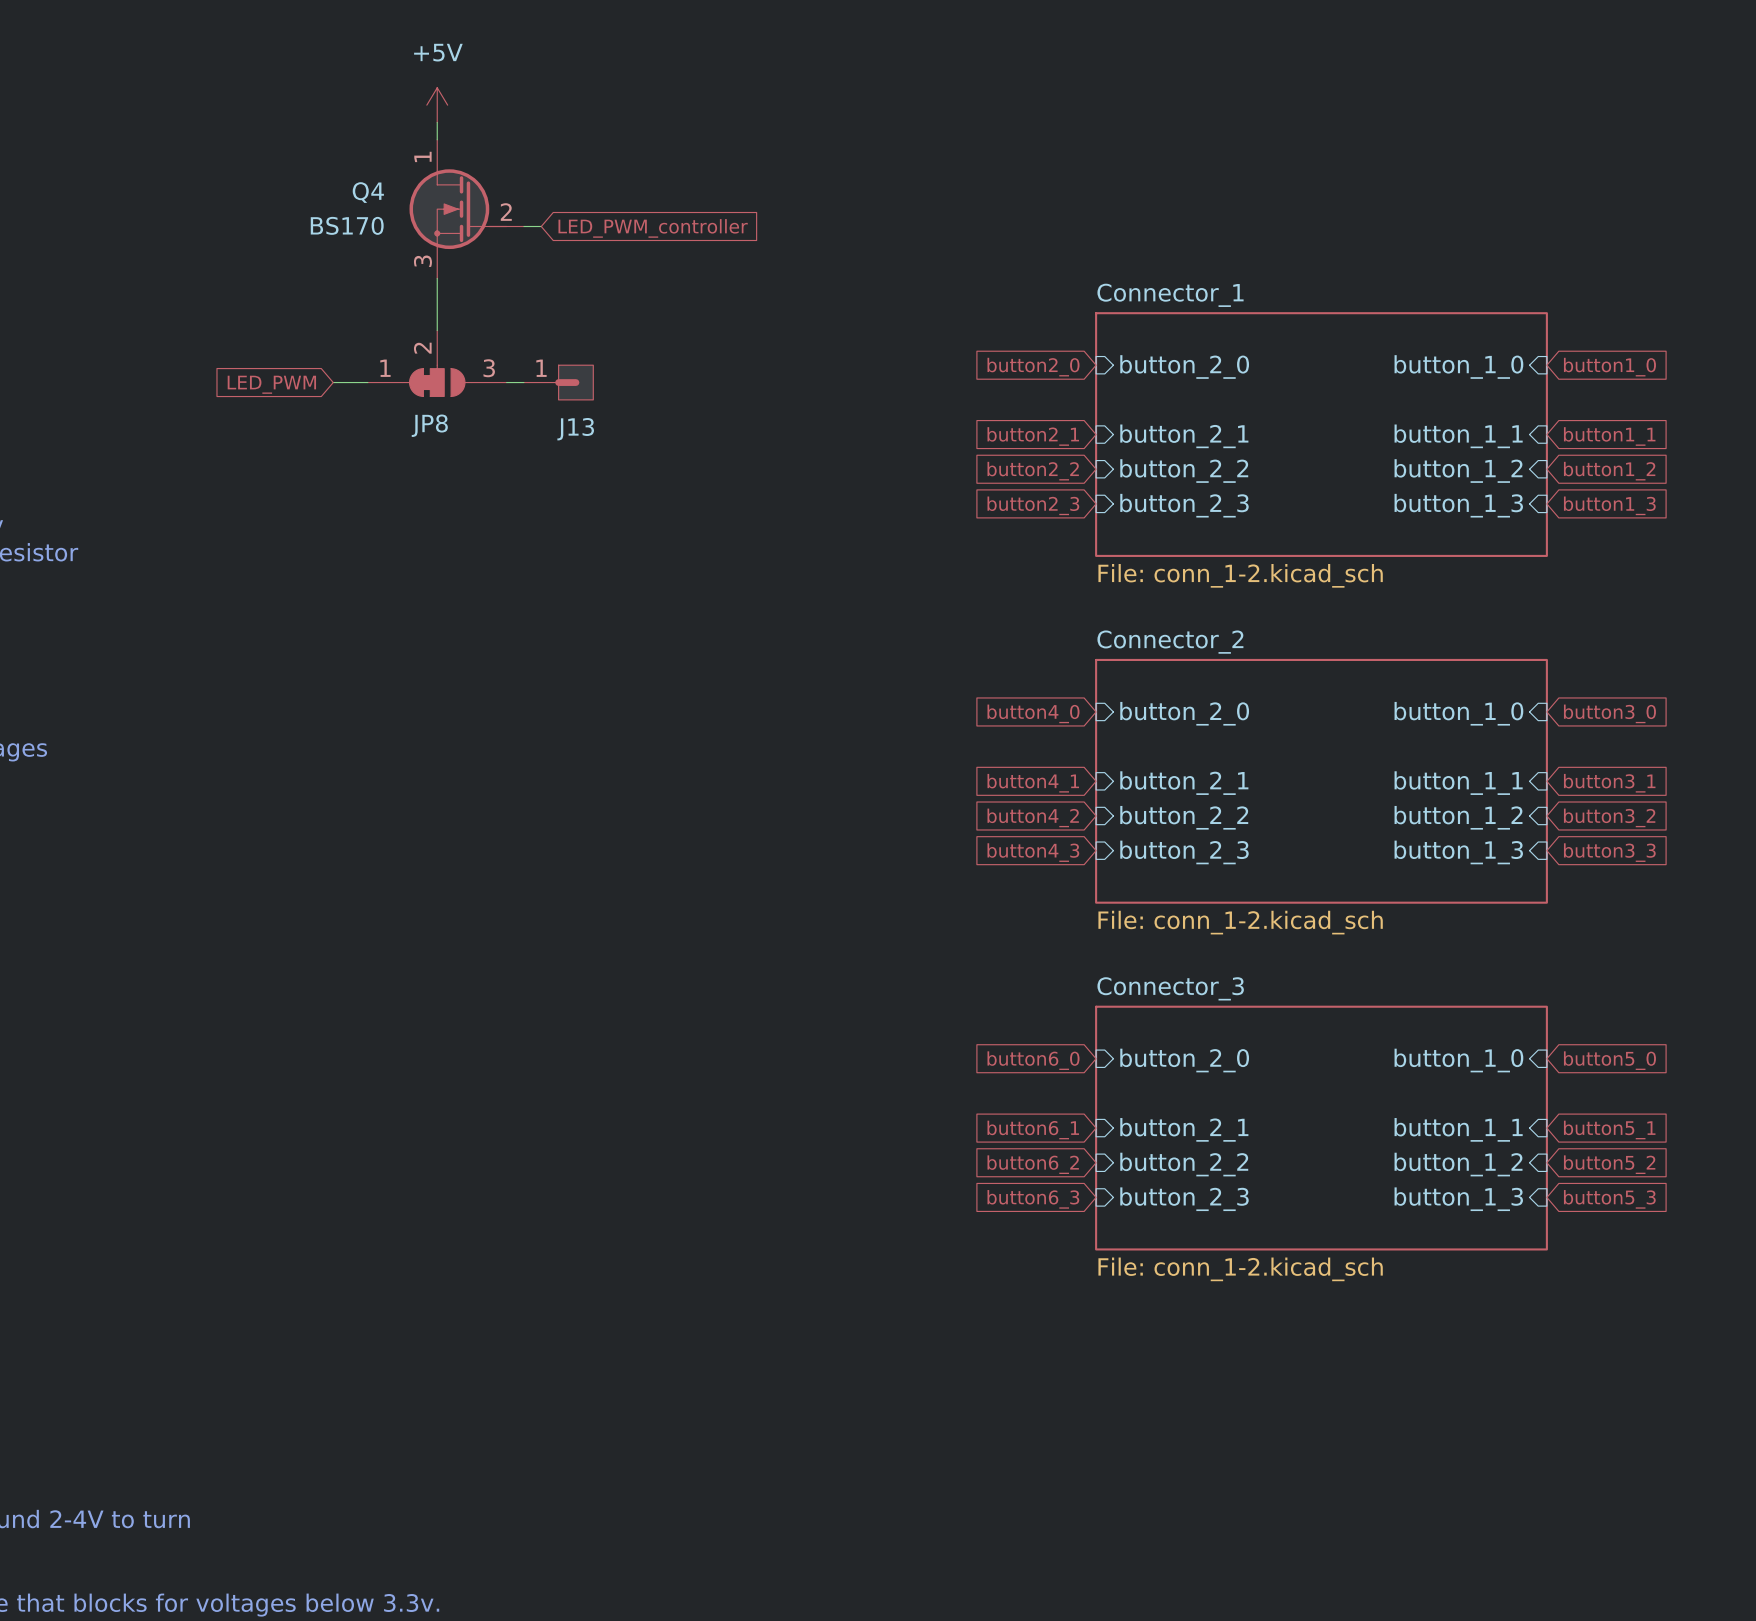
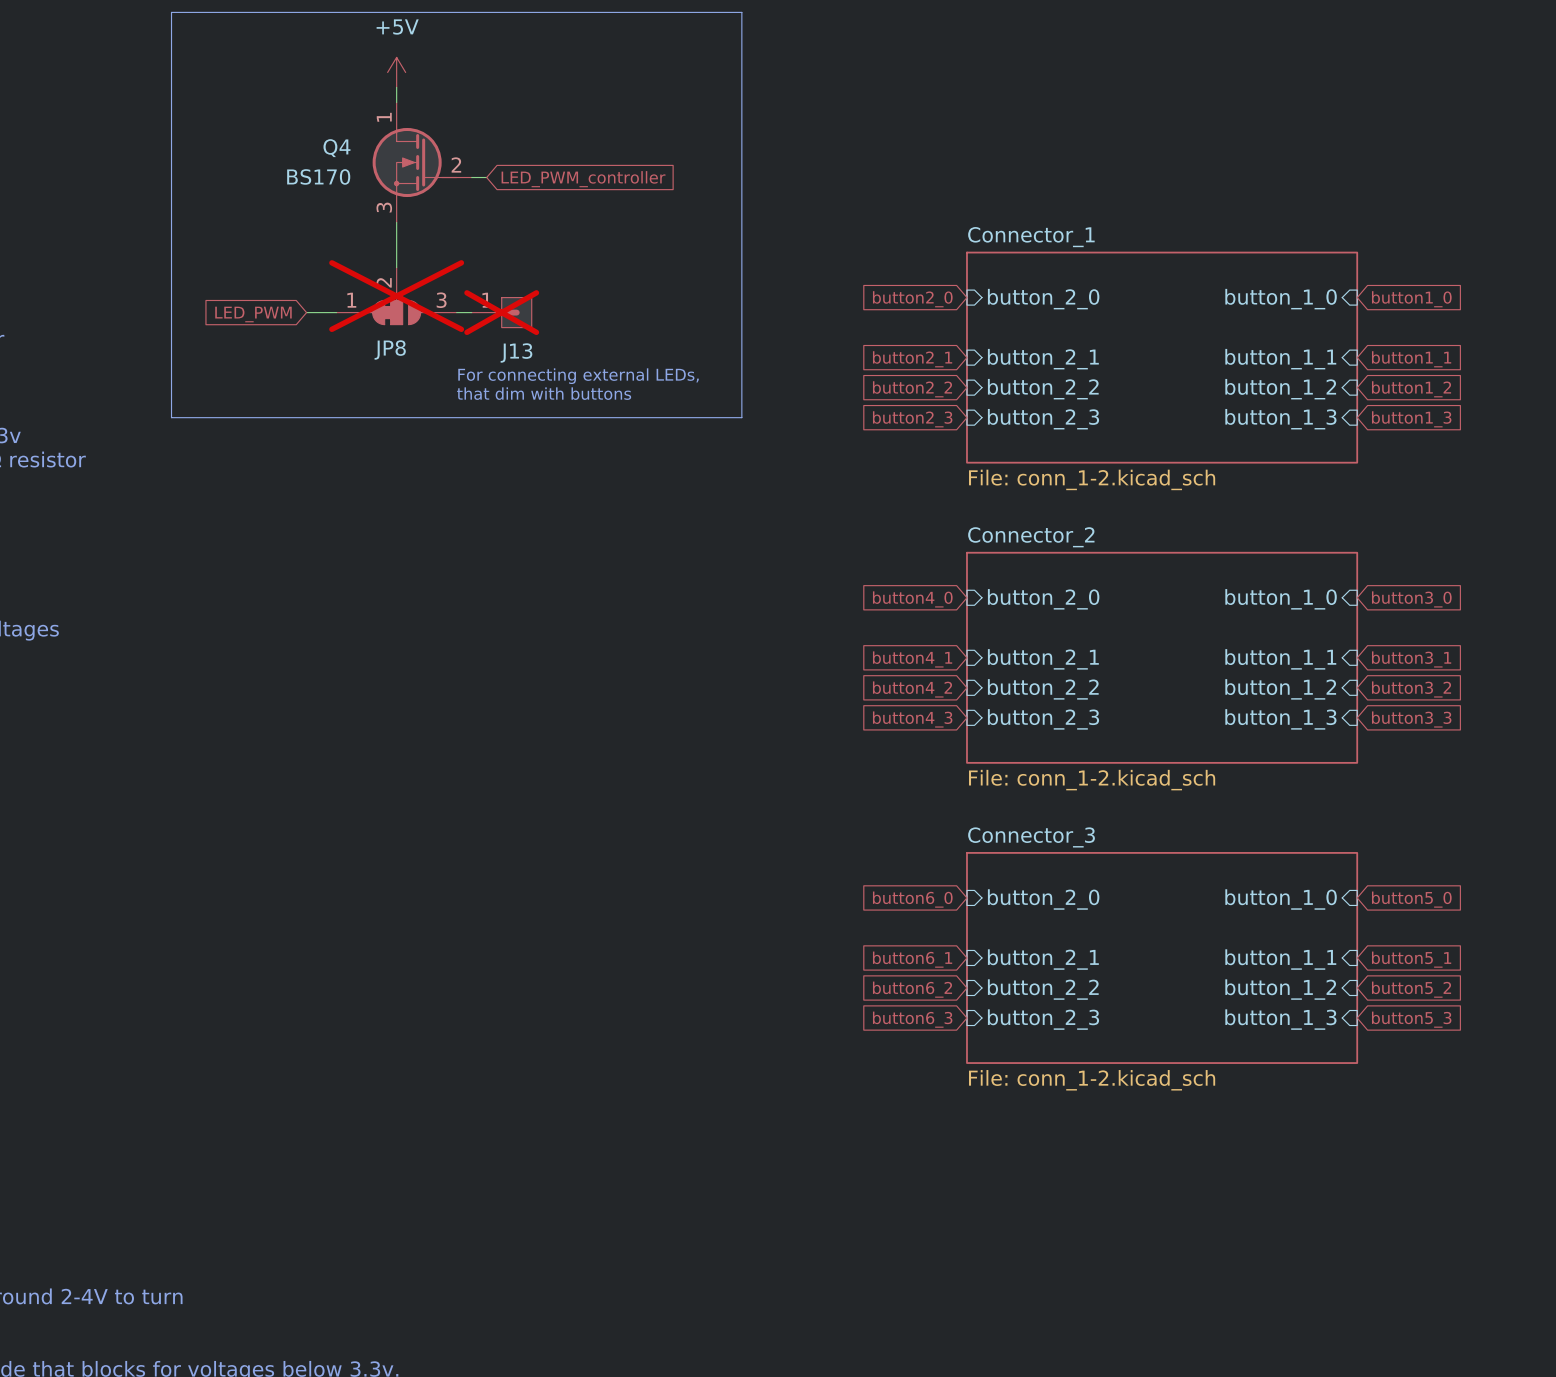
line: none -> (171, 12) (741, 12) (741, 417) (171, 417) (171, 12)
JP8 do-not-place cross: none -> (396, 296)
J13 do-not-place cross: none -> (501, 312)
text: none -> For connecting external LEDs, (578, 376)
text: none -> that dim with buttons (544, 393)

